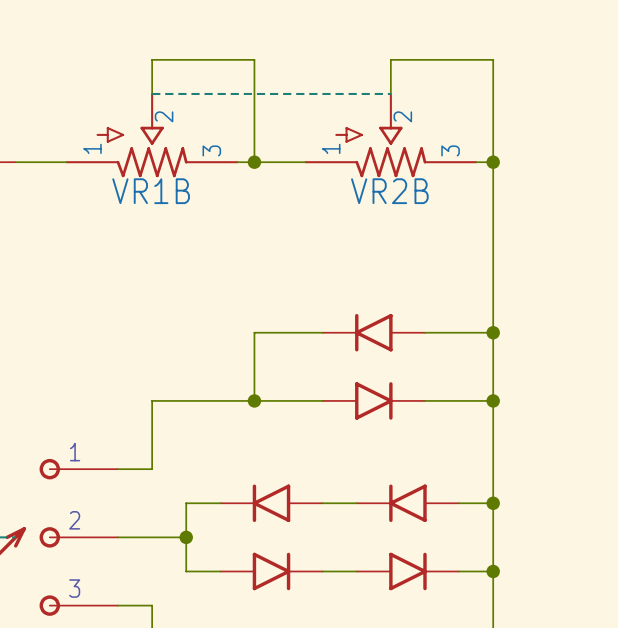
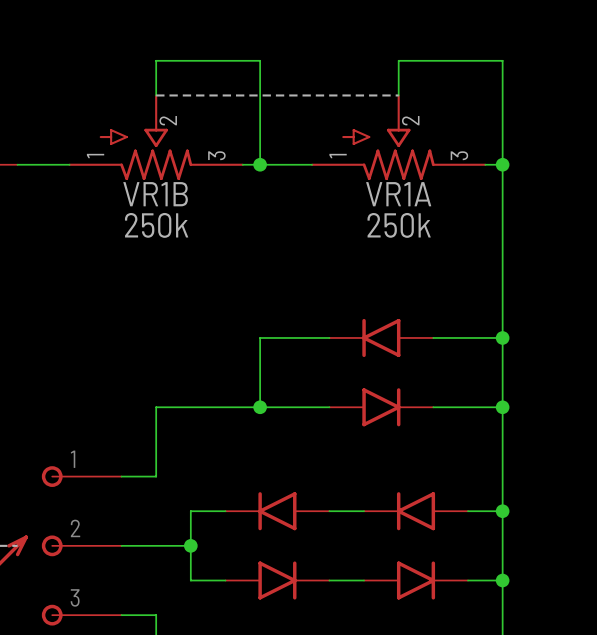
VR2B name: VR2B (389, 191) -> VR1A (398, 194)
VR1B value: none -> 250k (156, 225)
VR2B value: none -> 250k (399, 225)

